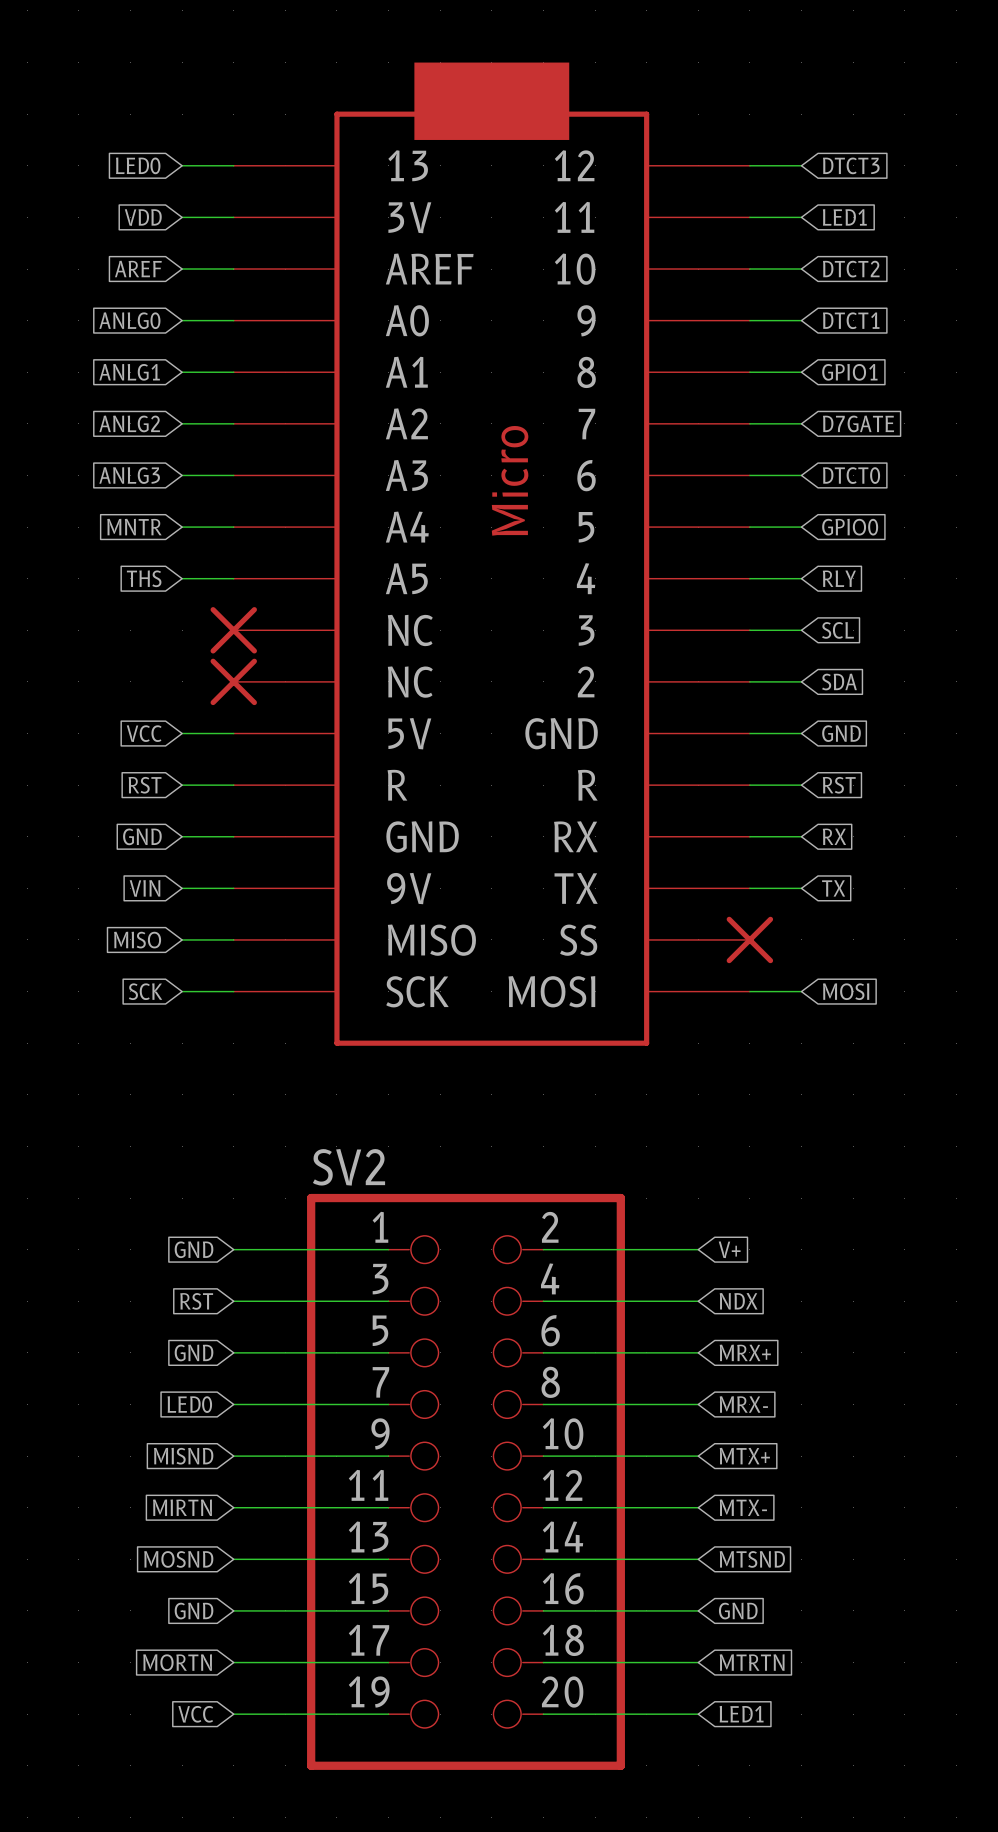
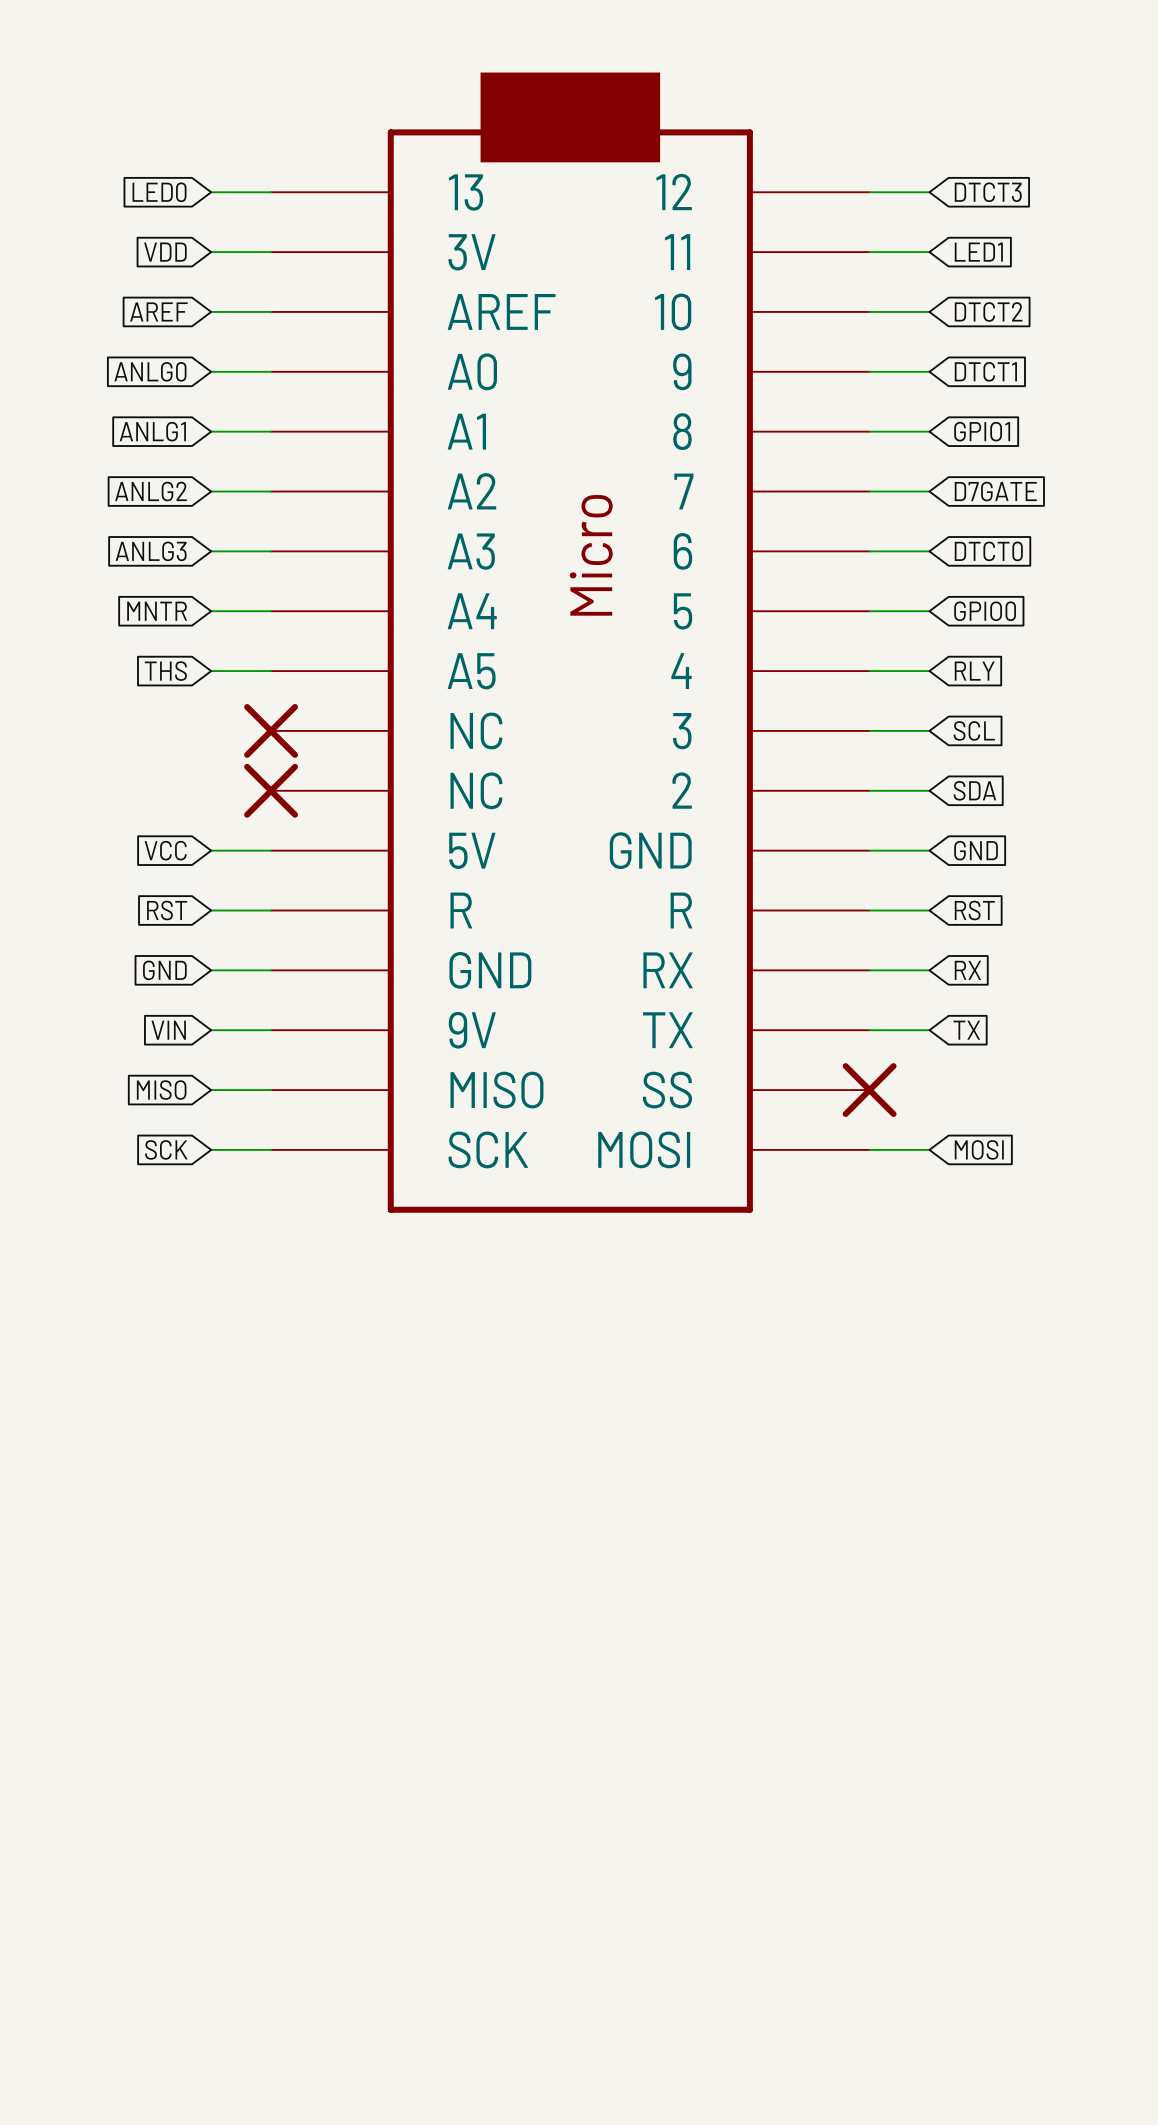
global label: GND (194, 1249) -> none
wire: (233, 1249) (388, 1249) -> none
wire: (543, 1249) (698, 1249) -> none
global label: V+ (729, 1249) -> none
global label: RST (196, 1301) -> none
wire: (233, 1301) (388, 1301) -> none
wire: (543, 1301) (698, 1301) -> none
global label: NDX (738, 1301) -> none
global label: GND (194, 1352) -> none
wire: (233, 1352) (388, 1352) -> none
wire: (543, 1352) (698, 1352) -> none
global label: MRX+ (745, 1352) -> none
global label: LED0 (189, 1404) -> none
wire: (233, 1404) (388, 1404) -> none
wire: (543, 1404) (698, 1404) -> none
global label: MRX- (743, 1404) -> none
global label: MISND (183, 1456) -> none
wire: (233, 1456) (388, 1456) -> none
wire: (543, 1456) (698, 1456) -> none
global label: MTX+ (744, 1456) -> none
SV2: (466, 1481) -> none
global label: MIRTN (182, 1507) -> none
wire: (233, 1507) (388, 1507) -> none
wire: (543, 1507) (698, 1507) -> none
global label: MTX- (743, 1507) -> none
global label: MOSND (178, 1559) -> none
wire: (233, 1559) (388, 1559) -> none
wire: (543, 1559) (698, 1559) -> none
global label: MTSND (752, 1559) -> none
wire: (233, 1610) (388, 1610) -> none
wire: (543, 1610) (698, 1610) -> none
global label: GND (194, 1611) -> none
global label: GND (738, 1611) -> none
global label: MORTN (177, 1662) -> none
wire: (233, 1662) (388, 1662) -> none
wire: (543, 1662) (698, 1662) -> none
global label: MTRTN (752, 1662) -> none
global label: VCC (195, 1714) -> none
wire: (233, 1714) (388, 1714) -> none
wire: (543, 1714) (698, 1714) -> none
global label: LED1 (741, 1714) -> none

